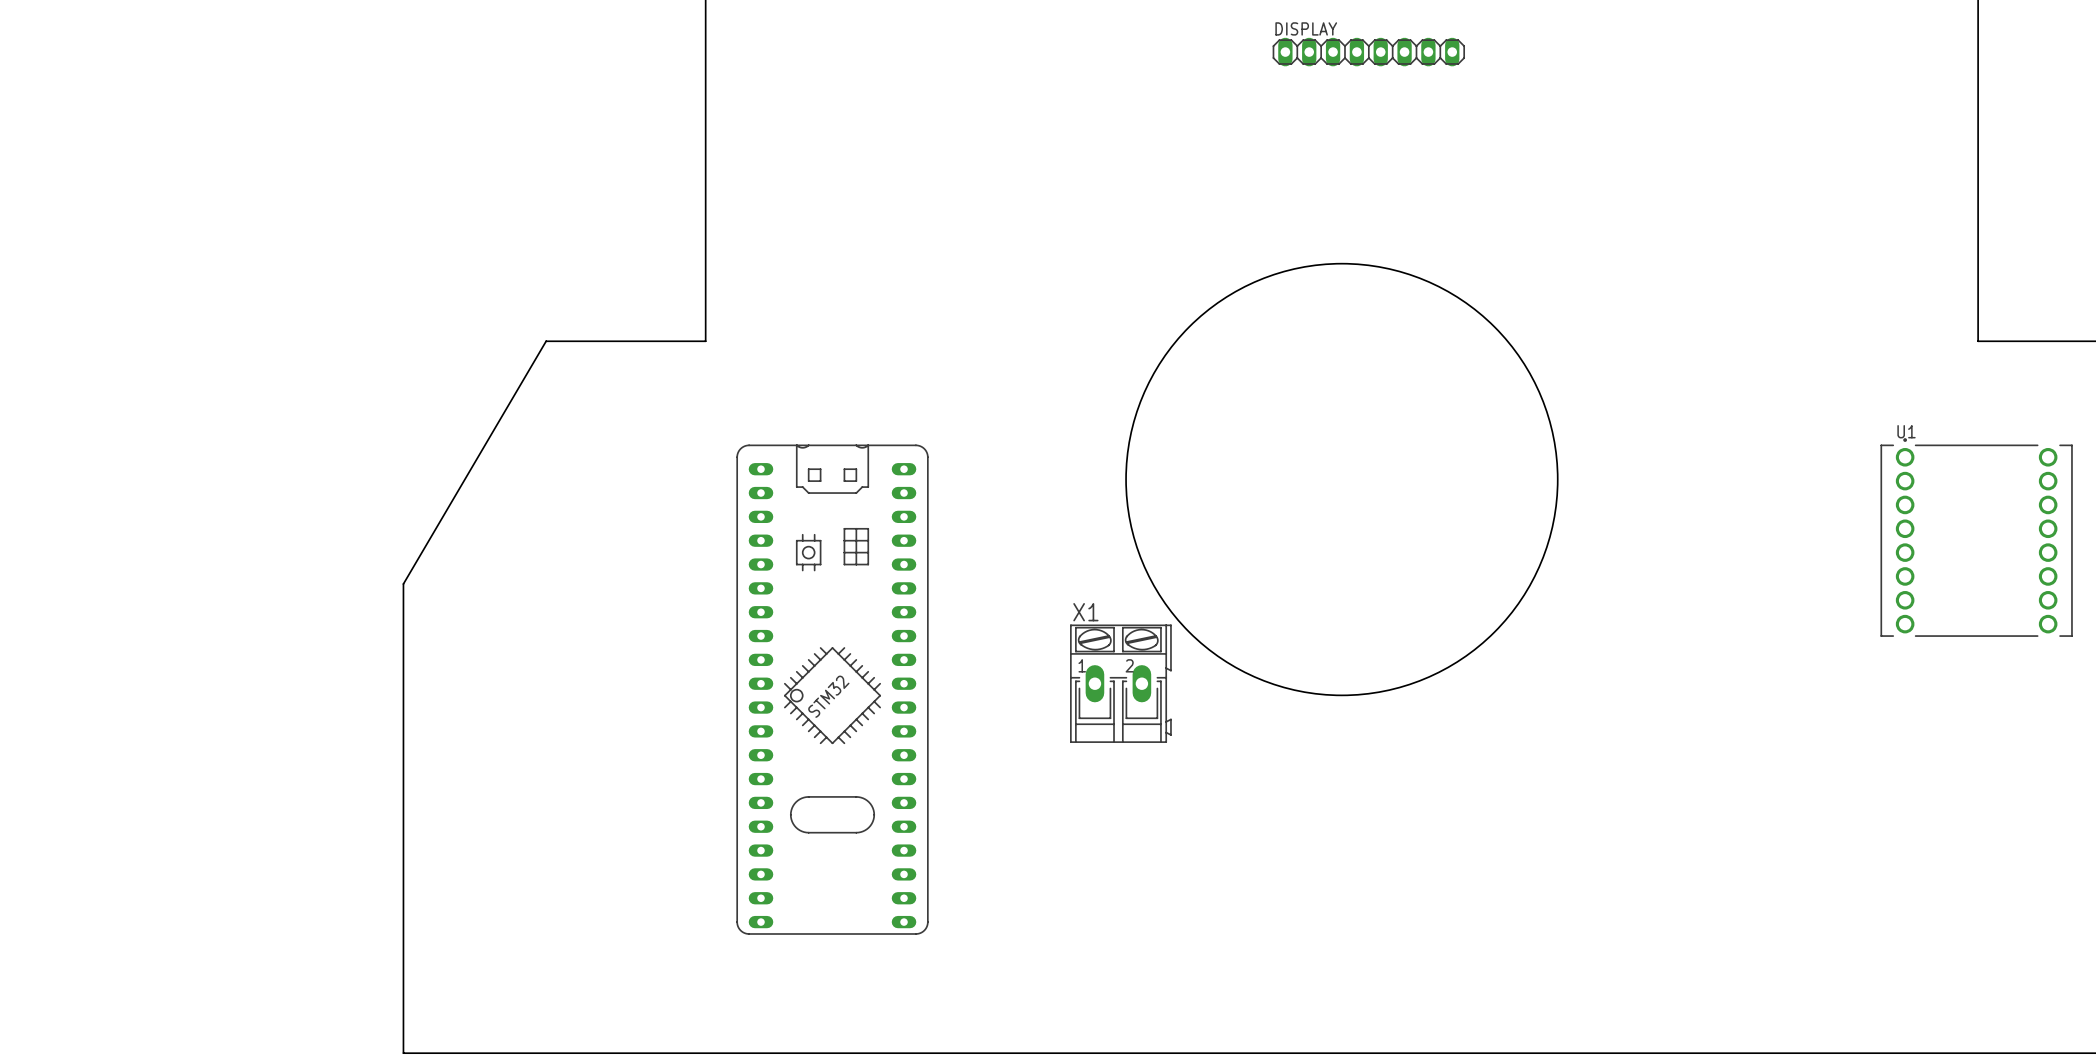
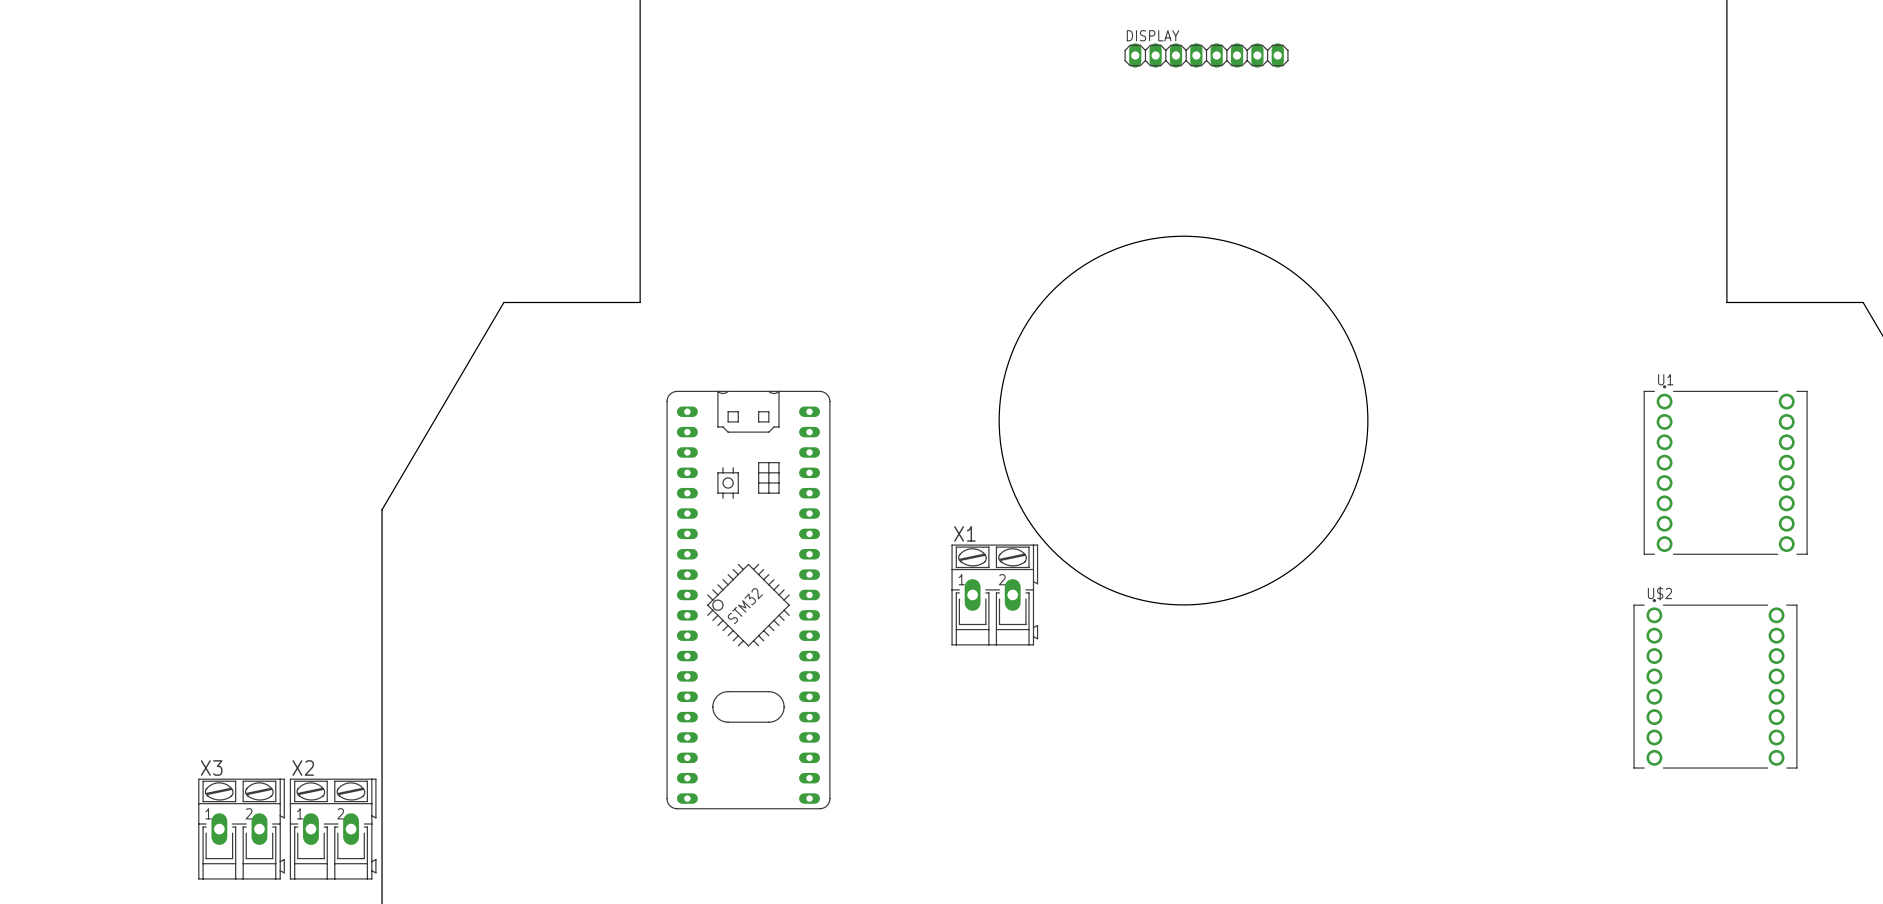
U$2: none -> (1715, 683)
X3: none -> (241, 829)
X2: none -> (333, 829)

